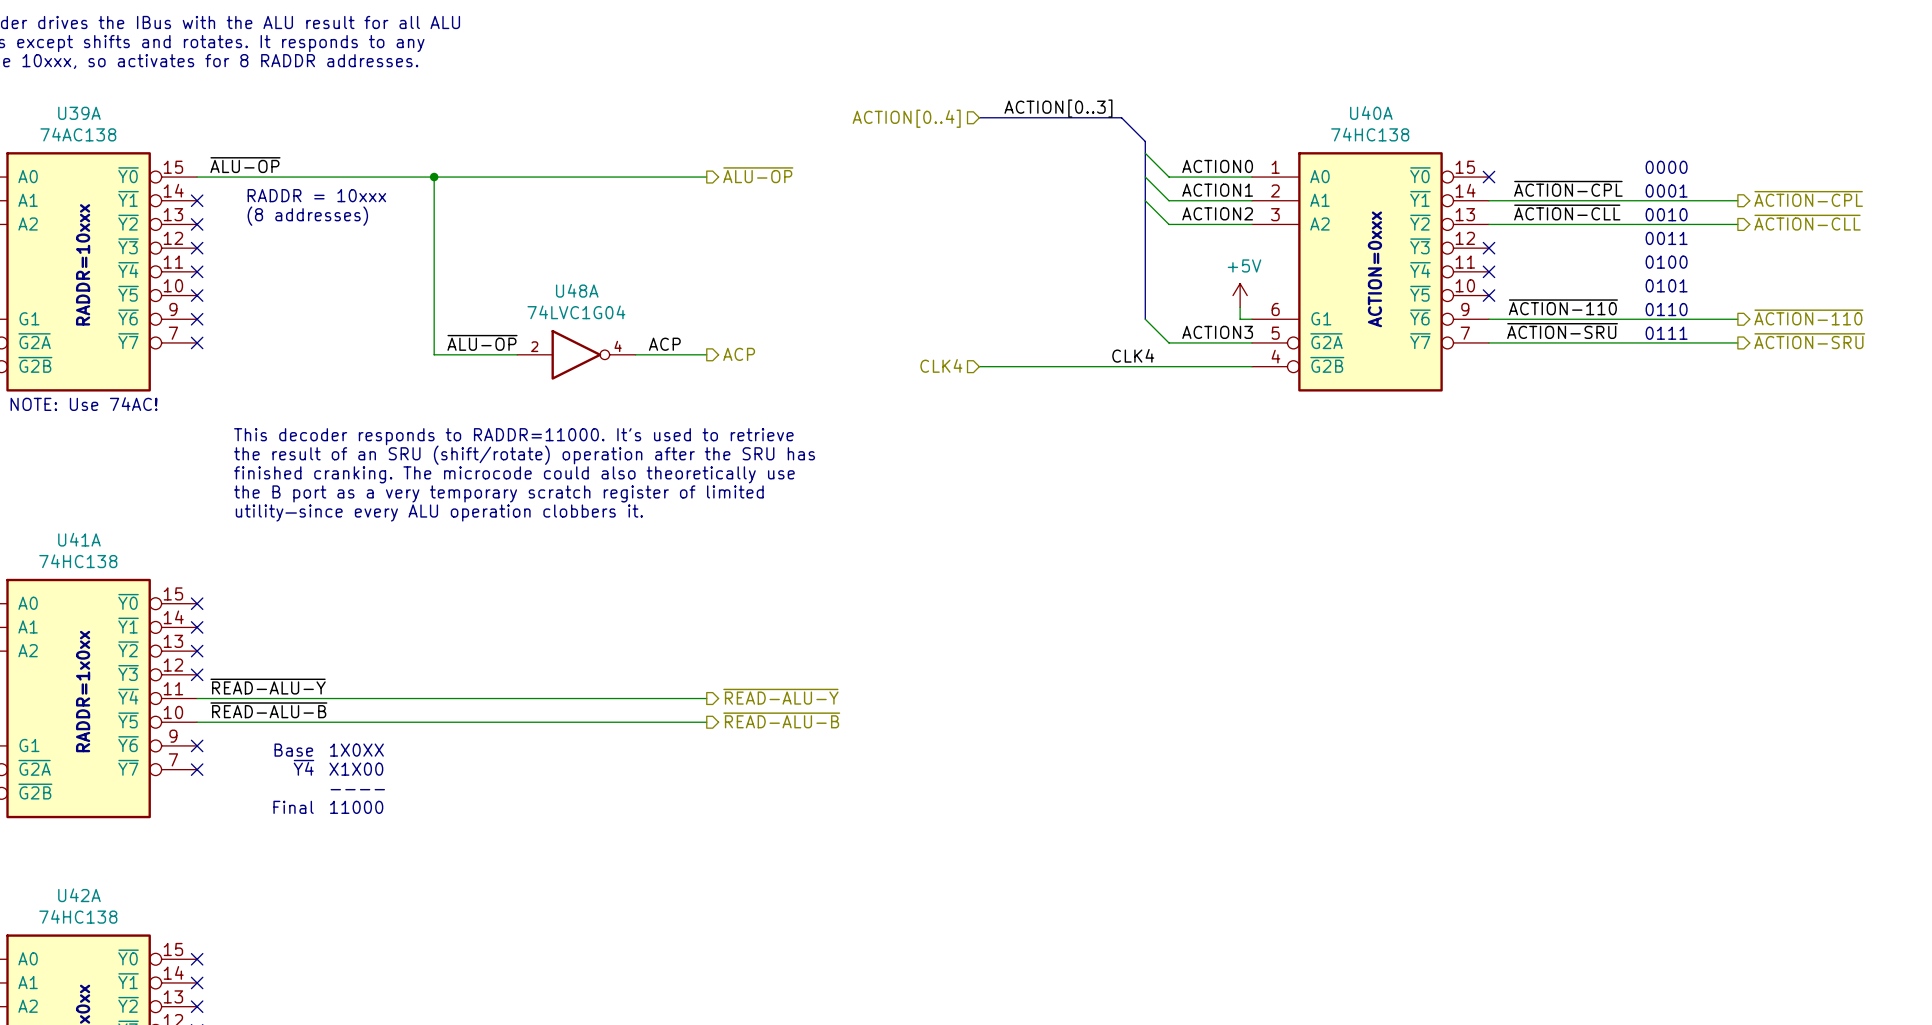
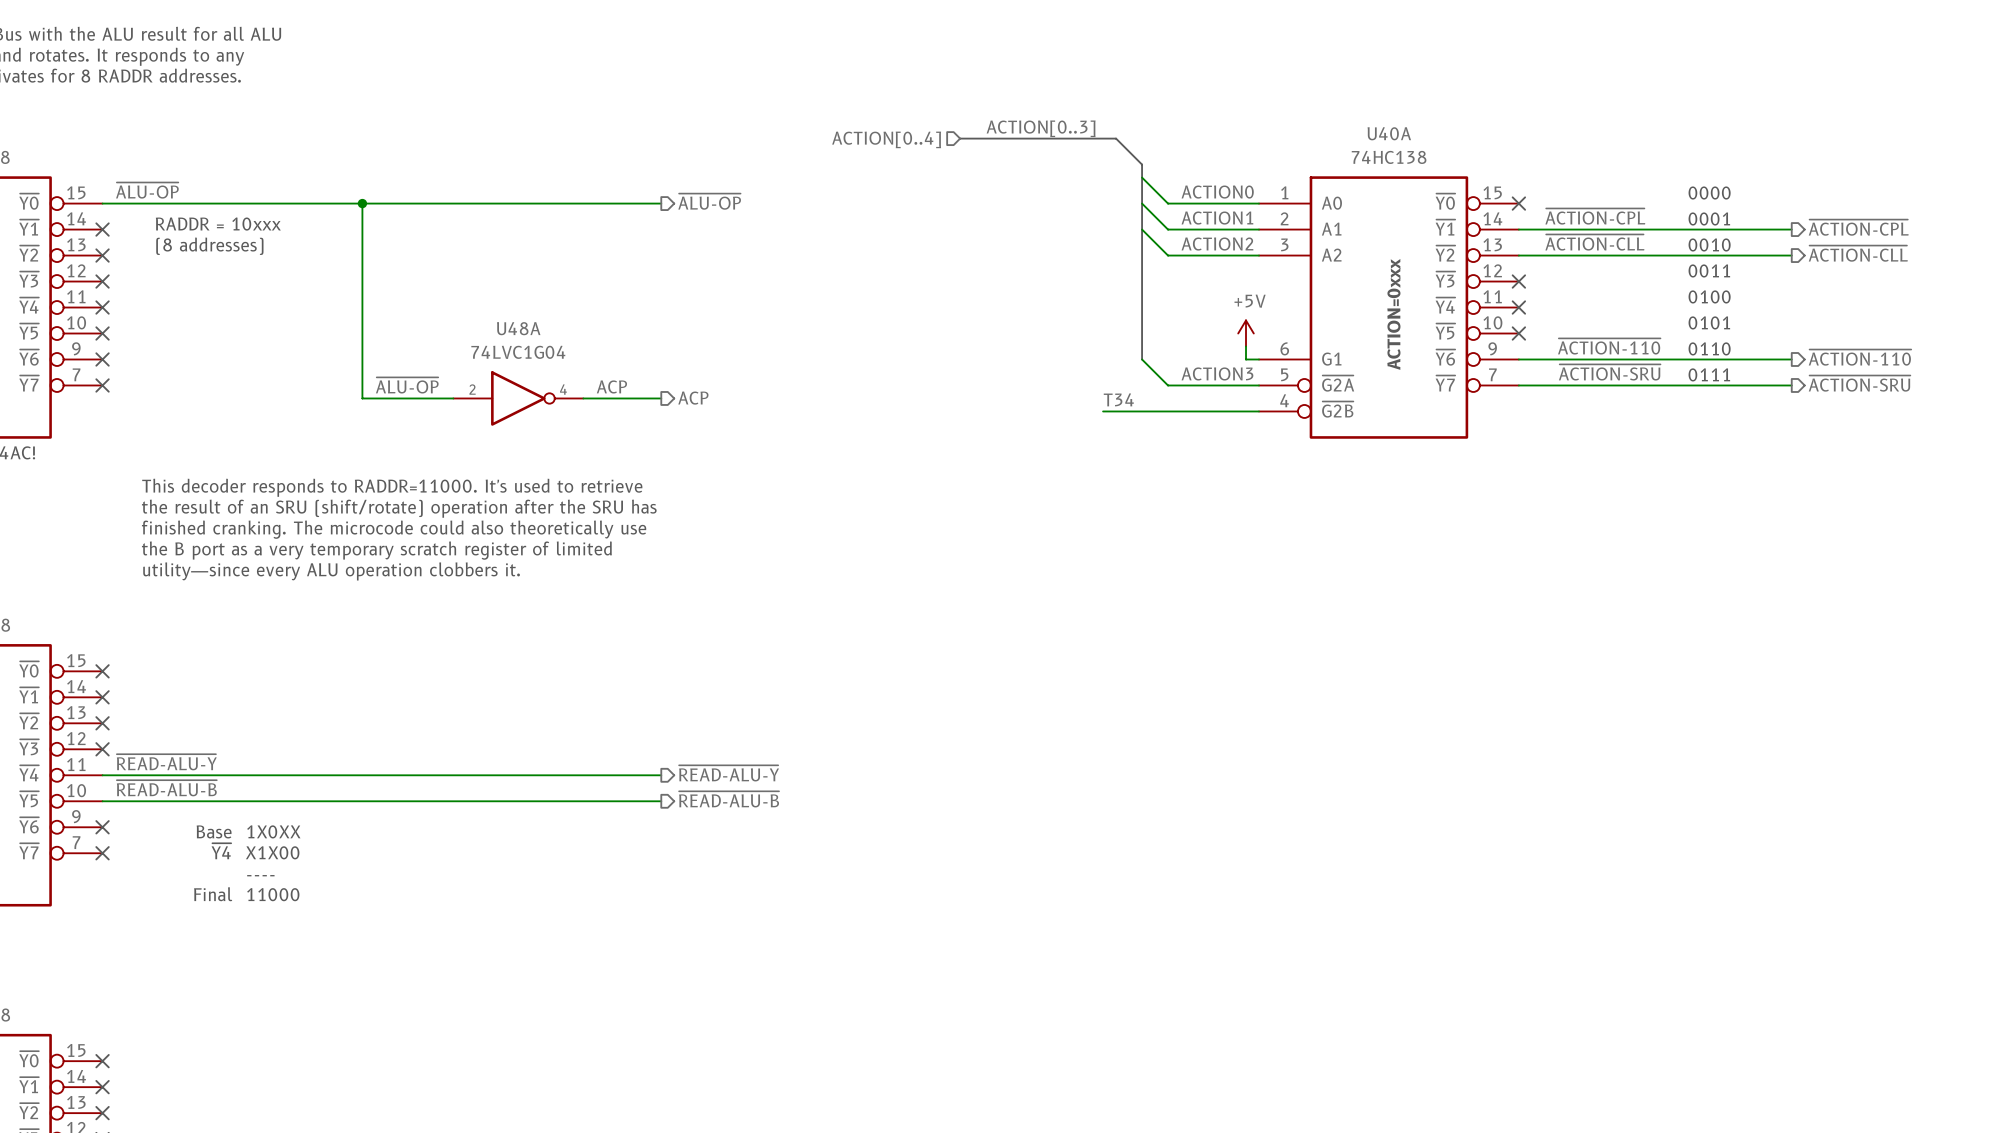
label: CLK4 (1133, 355) -> T34 (1118, 399)
hierarchical label: CLK4 (941, 365) -> none
wire: (979, 366) (1109, 366) -> none

